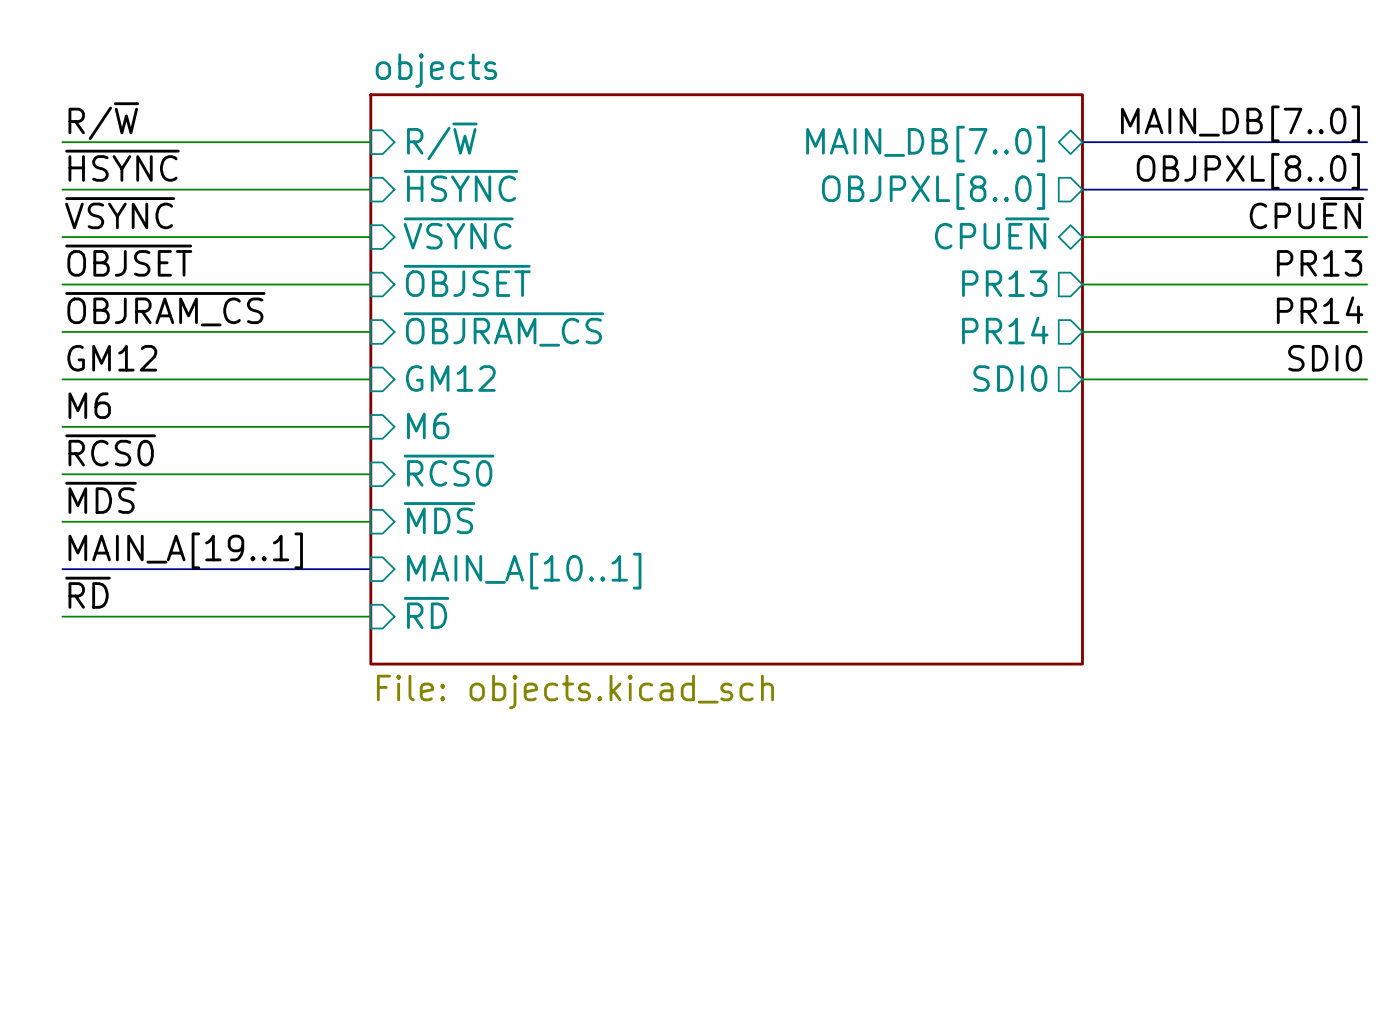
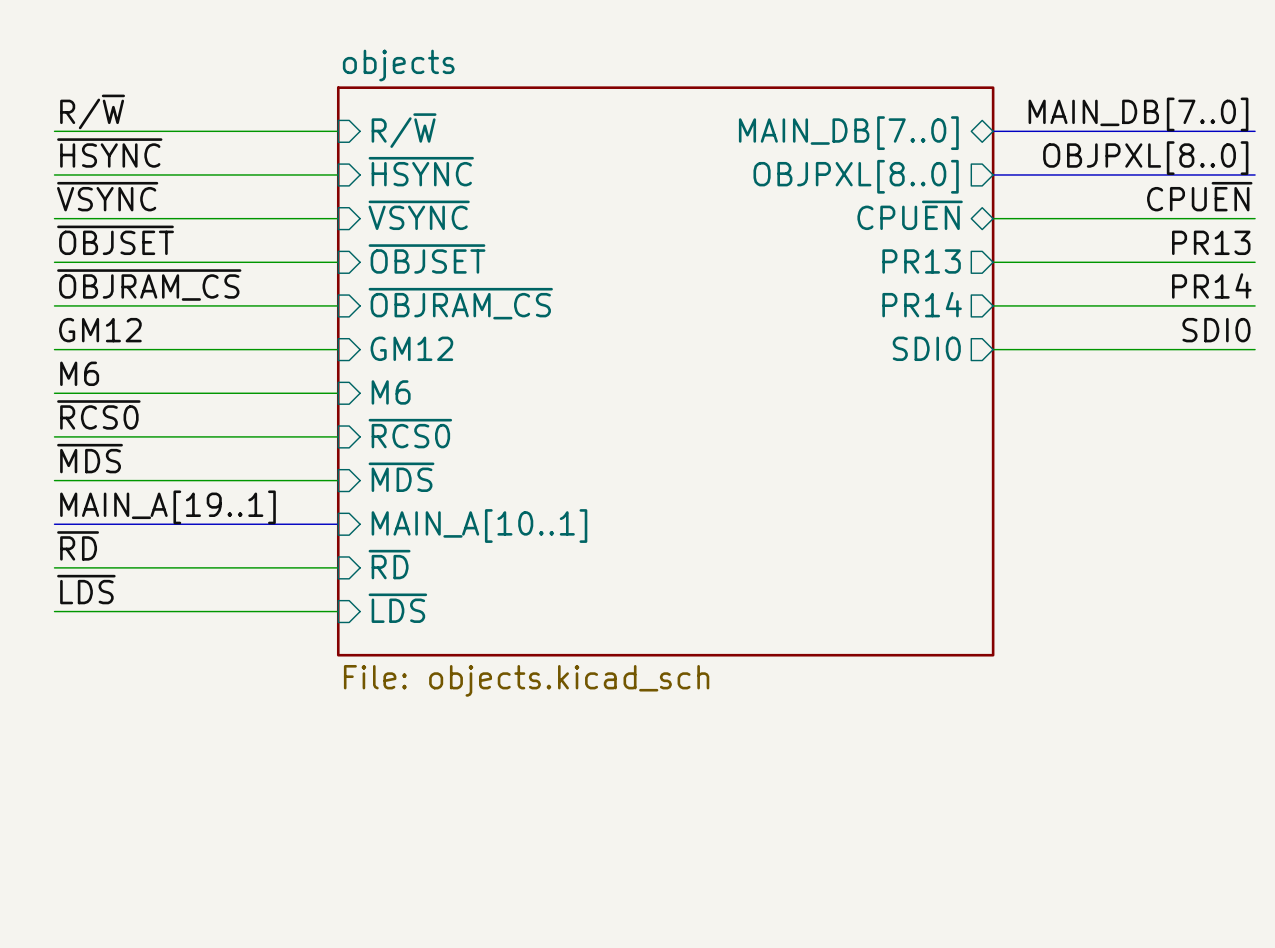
sheet objects: File: objects.kicad_sch (726, 379) -> none
sheet objects: none -> File: objects.kicad_sch (665, 371)
label: none -> ~{LDS} (86, 589)
sheet pin: none -> ~{LDS} (397, 608)
wire: none -> (54, 611) (338, 611)

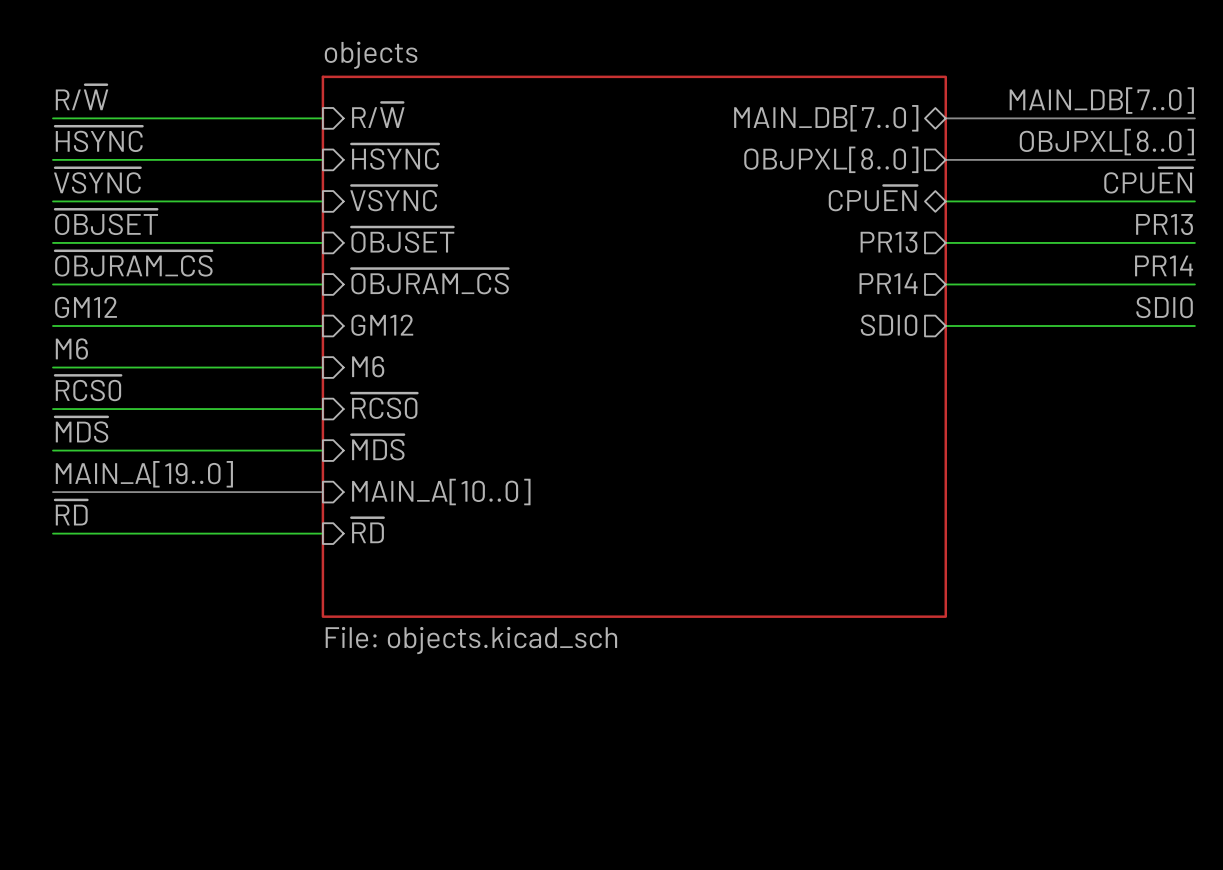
label: MAIN_A[19..1] (167, 507) -> MAIN_A[19..0] (144, 474)
sheet pin: MAIN_A[10..1] (479, 526) -> MAIN_A[10..0] (441, 492)
label: ~{LDS} (86, 589) -> none
sheet pin: ~{LDS} (397, 608) -> none
wire: (54, 611) (338, 611) -> none

